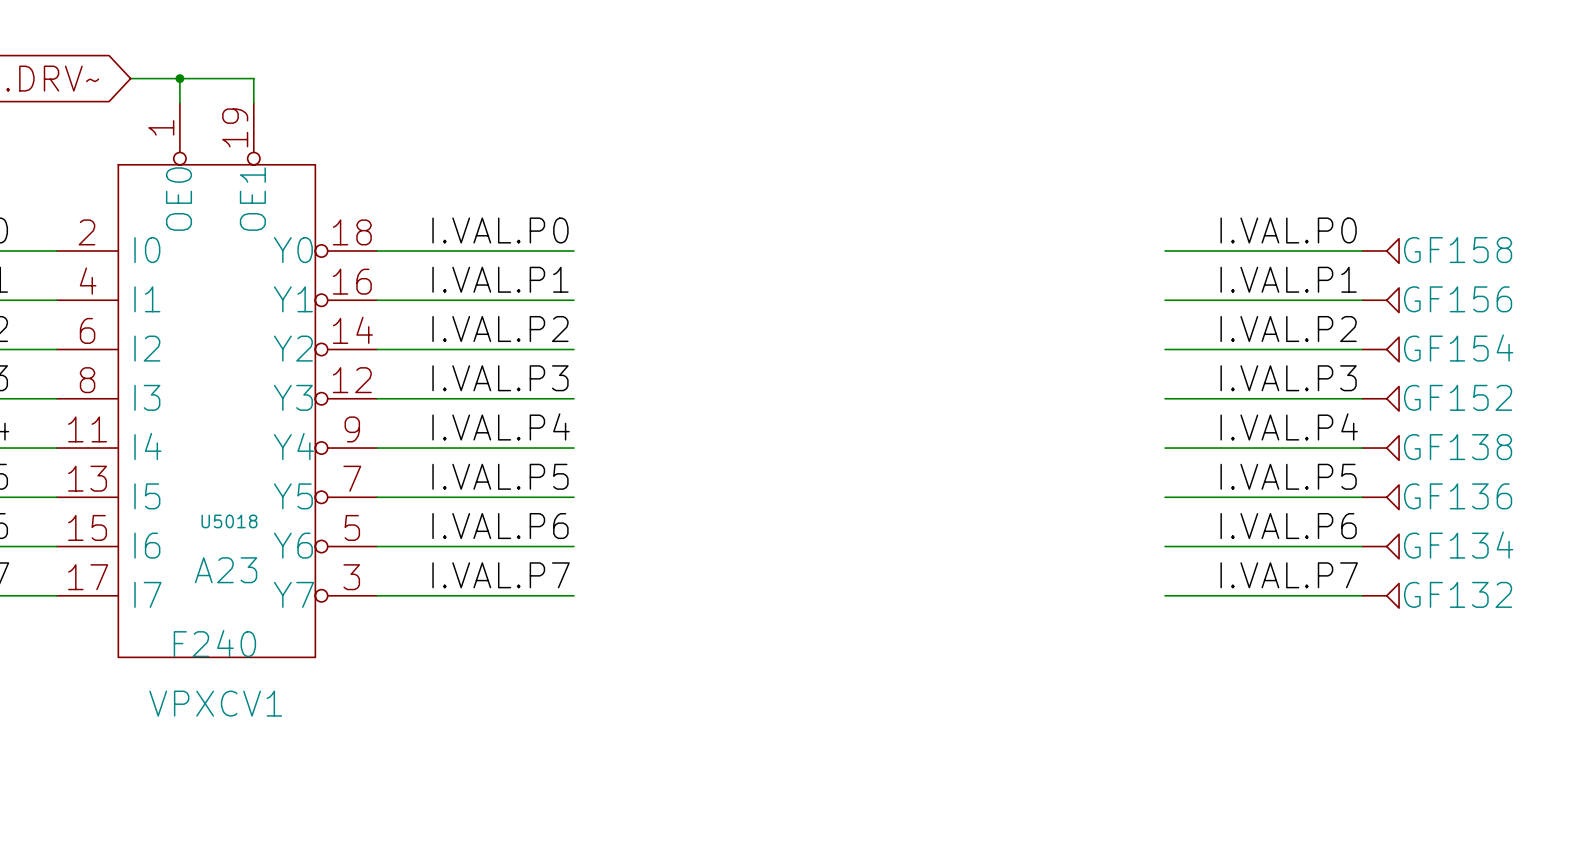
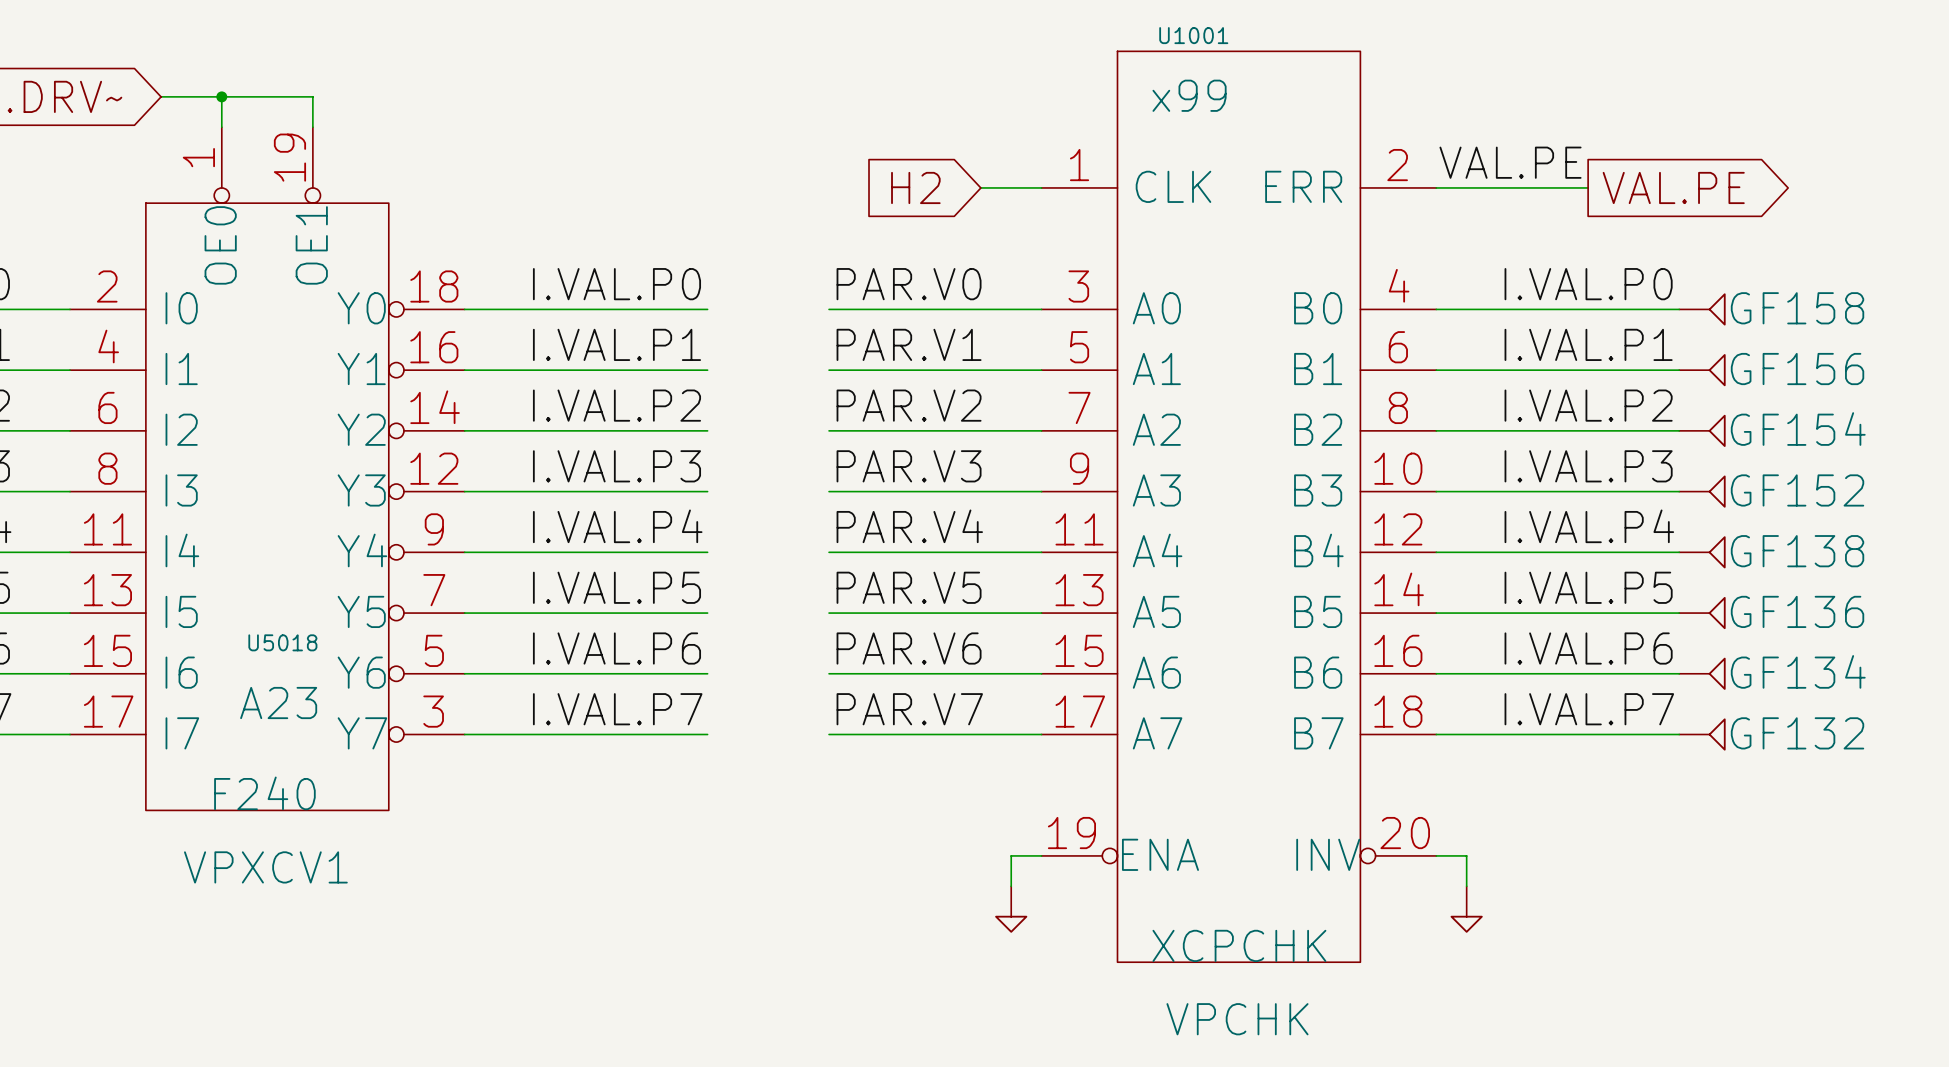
label: none -> VAL.PE (1510, 162)
global label: none -> H2 (915, 187)
wire: none -> (980, 187) (1041, 187)
wire: none -> (1436, 187) (1588, 187)
global label: none -> VAL.PE (1673, 187)
label: none -> PAR.V0 (909, 284)
wire: none -> (829, 309) (1041, 309)
label: none -> PAR.V1 (909, 344)
wire: none -> (829, 370) (1041, 370)
label: none -> PAR.V2 (909, 405)
wire: none -> (829, 430) (1041, 430)
label: none -> PAR.V3 (909, 466)
wire: none -> (829, 491) (1041, 491)
U1001: none -> XCPCHK (1238, 506)
label: none -> PAR.V4 (909, 526)
wire: none -> (829, 552) (1041, 552)
label: none -> PAR.V5 (909, 587)
wire: none -> (829, 613) (1041, 613)
label: none -> PAR.V6 (909, 648)
wire: none -> (829, 673) (1041, 673)
label: none -> PAR.V7 (909, 709)
wire: none -> (829, 734) (1041, 734)
wire: none -> (1041, 855) (1011, 855) (1011, 886)
wire: none -> (1436, 855) (1466, 855) (1466, 886)
power symbol: none -> (1011, 909)
power symbol: none -> (1466, 909)

